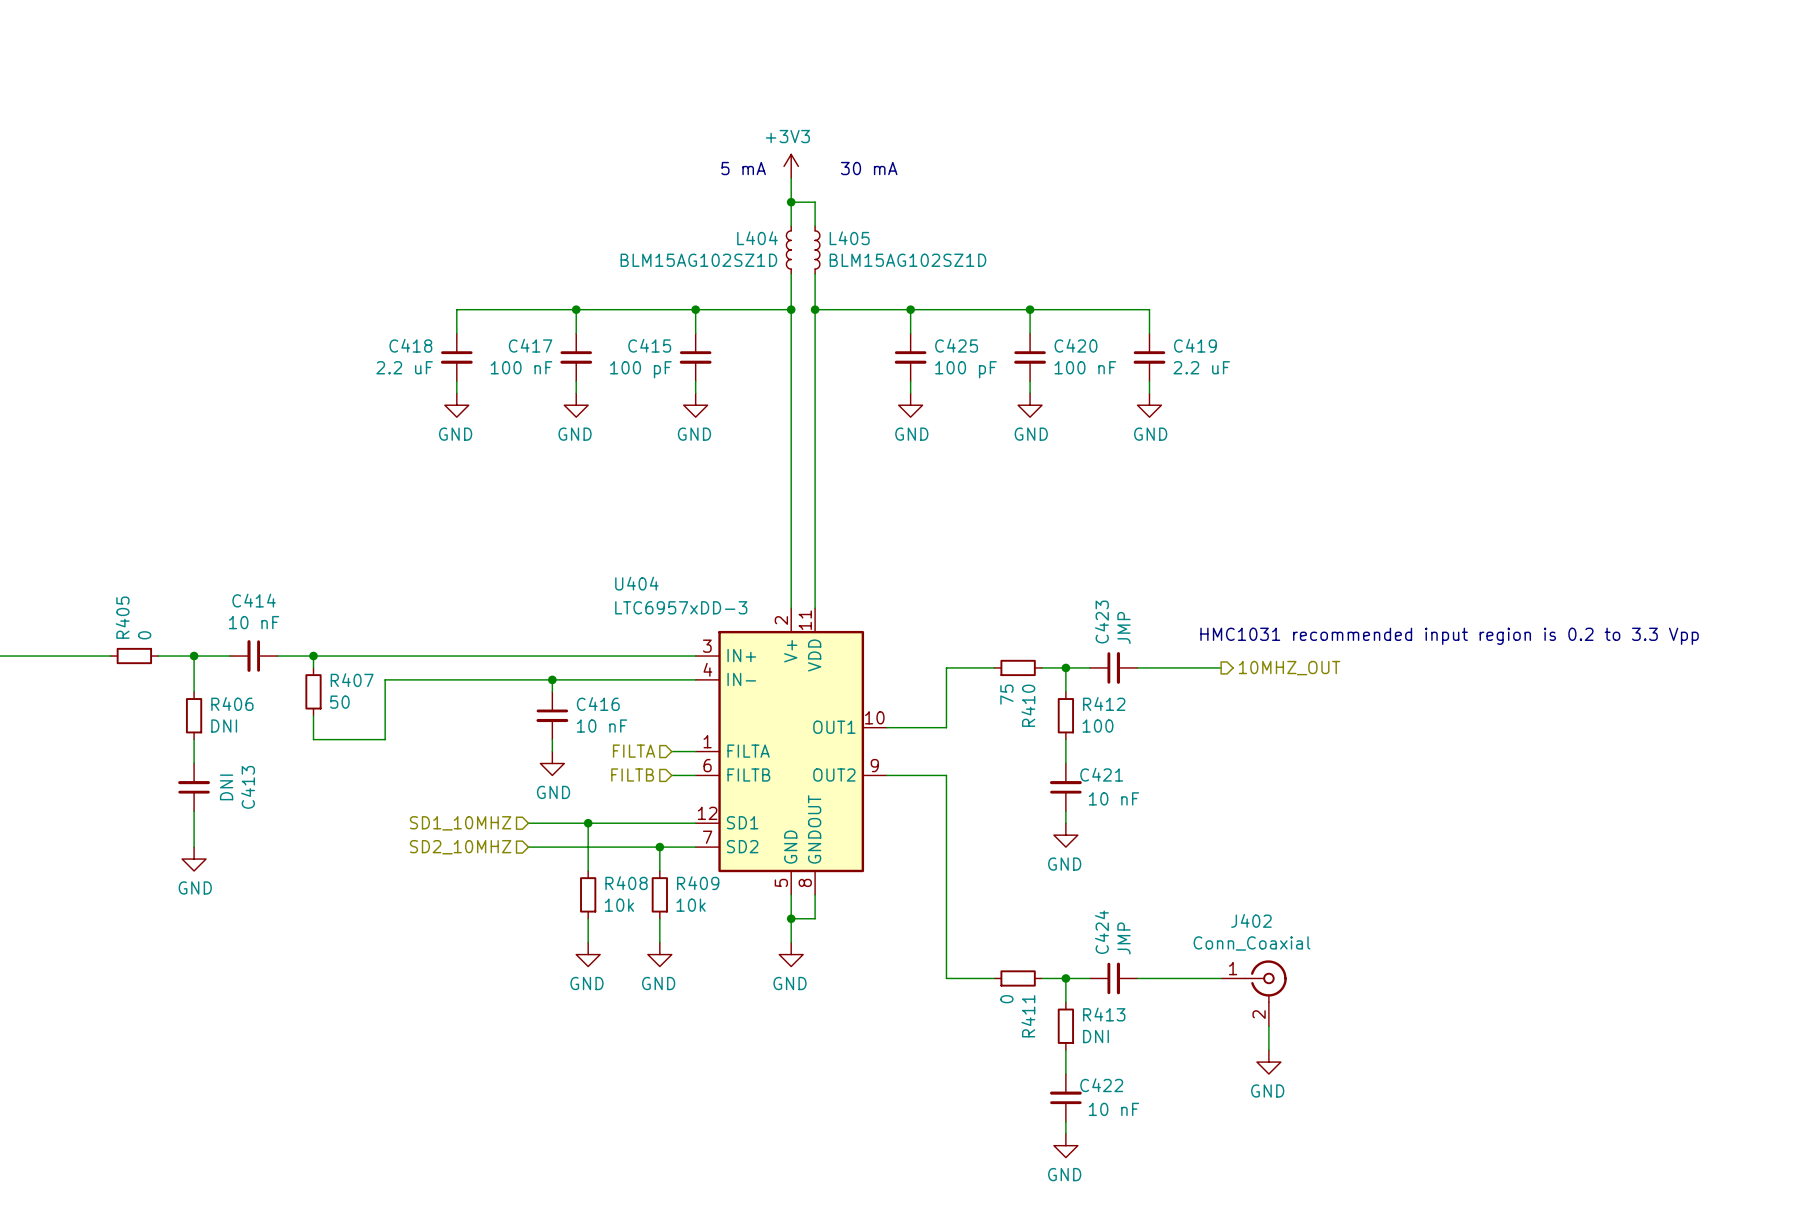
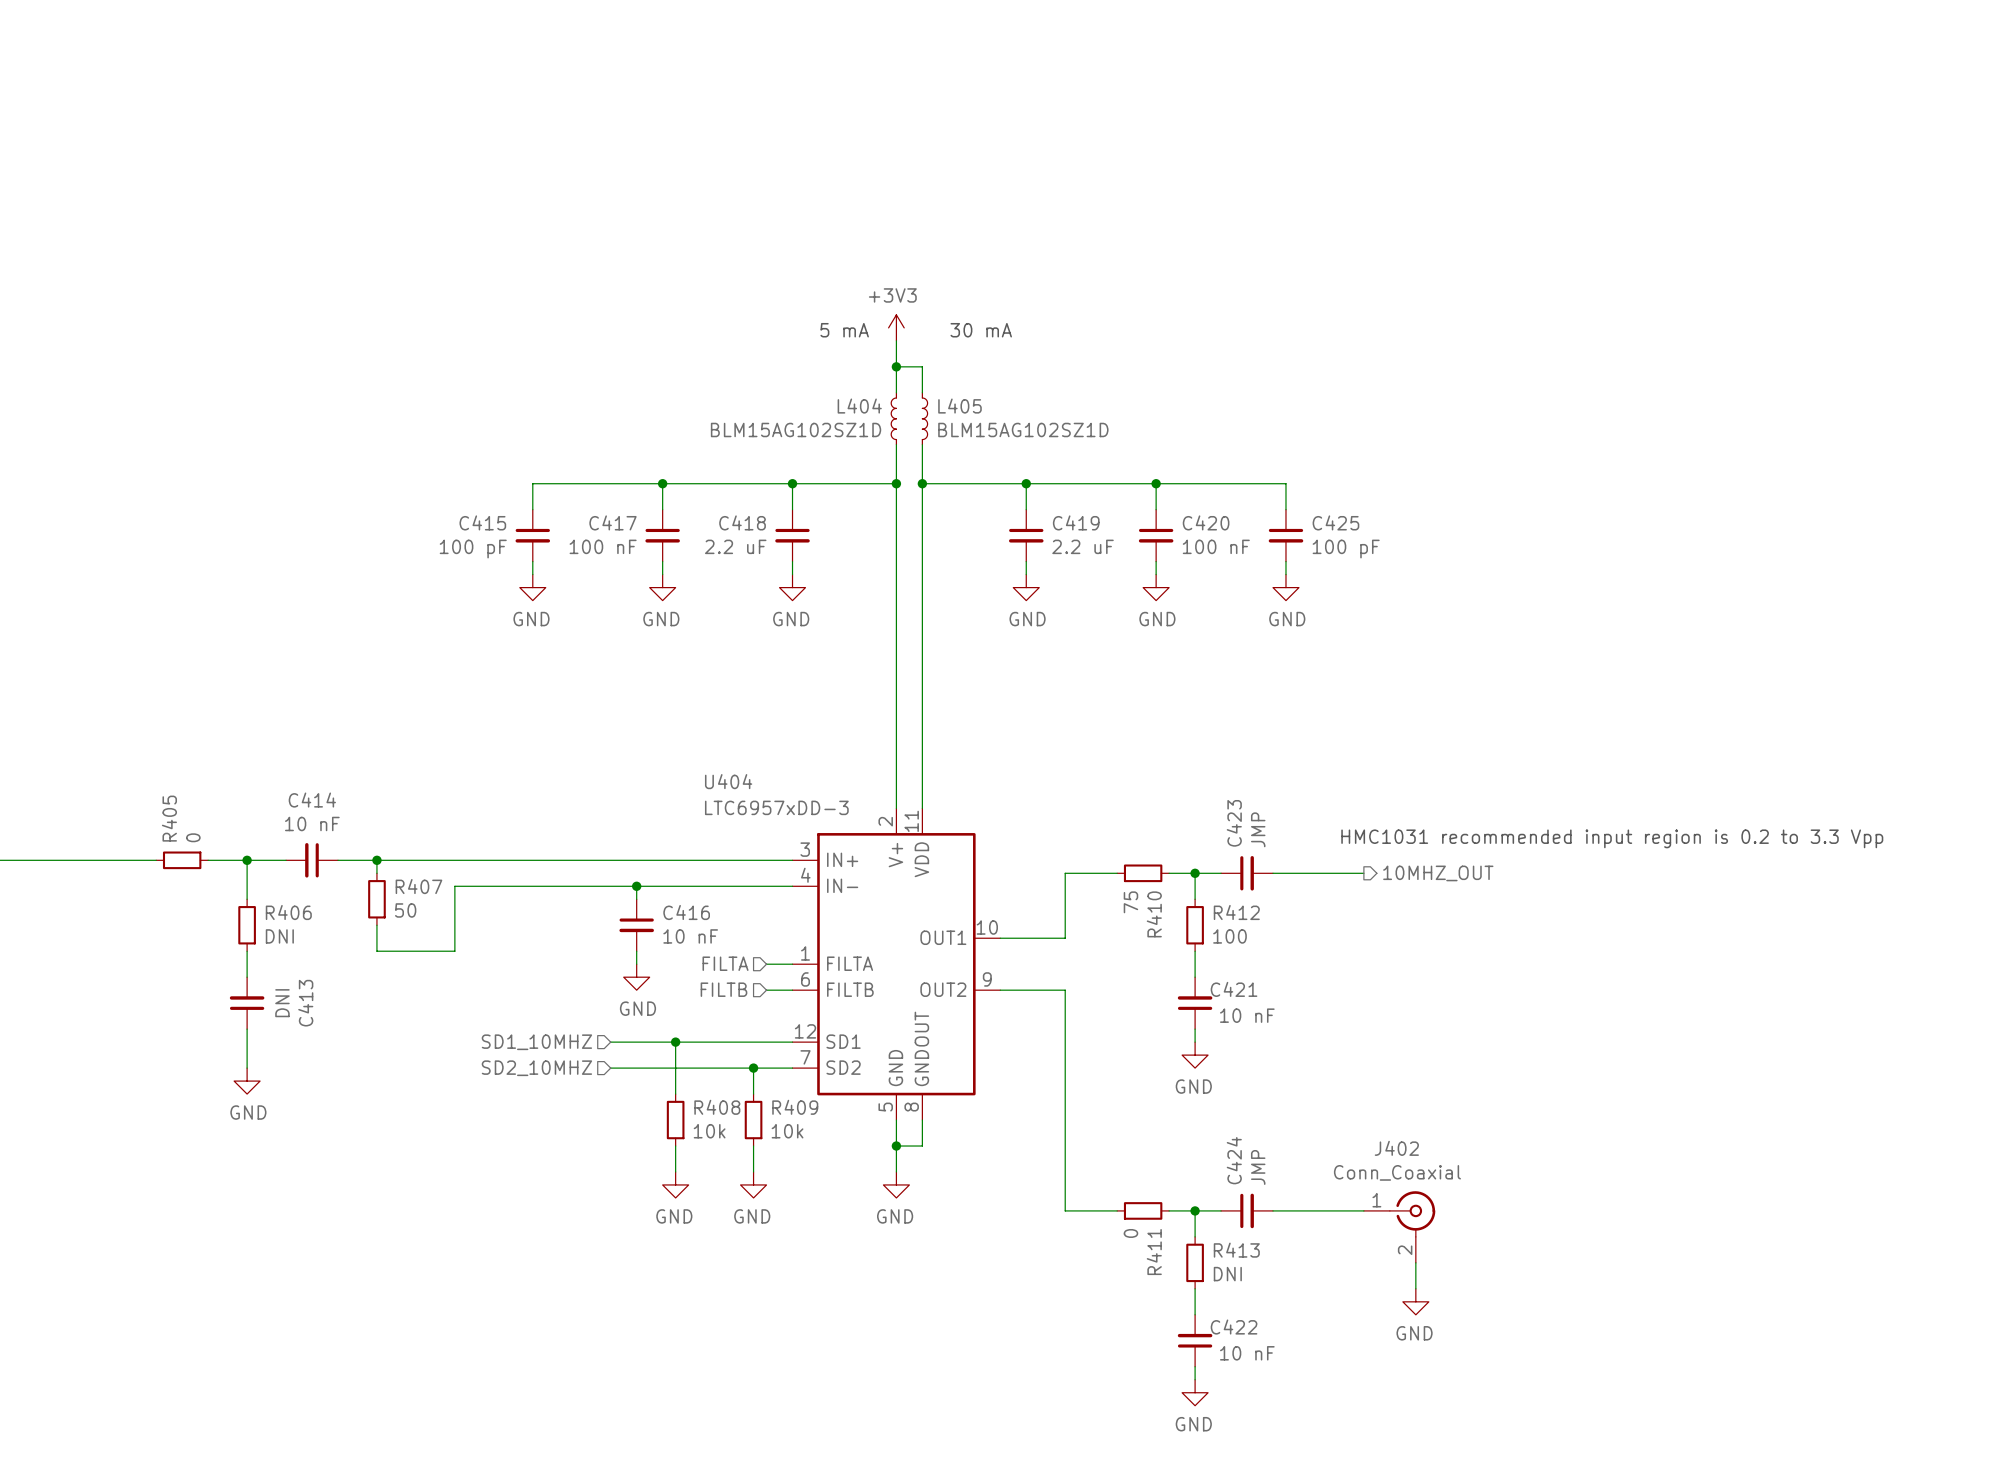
C418 name: C418 (410, 345) -> C415 (482, 522)
C415 name: C415 (649, 345) -> C418 (742, 522)
C425 name: C425 (956, 345) -> C419 (1076, 522)
C419 name: C419 (1195, 345) -> C425 (1335, 522)
C418 value: 2.2 uF (404, 367) -> 100 pF (473, 549)
C419 value: 2.2 uF (1201, 367) -> 100 pF (1346, 549)
C415 value: 100 pF (640, 369) -> 2.2 uF (735, 546)
C425 value: 100 pF (965, 369) -> 2.2 uF (1083, 546)

